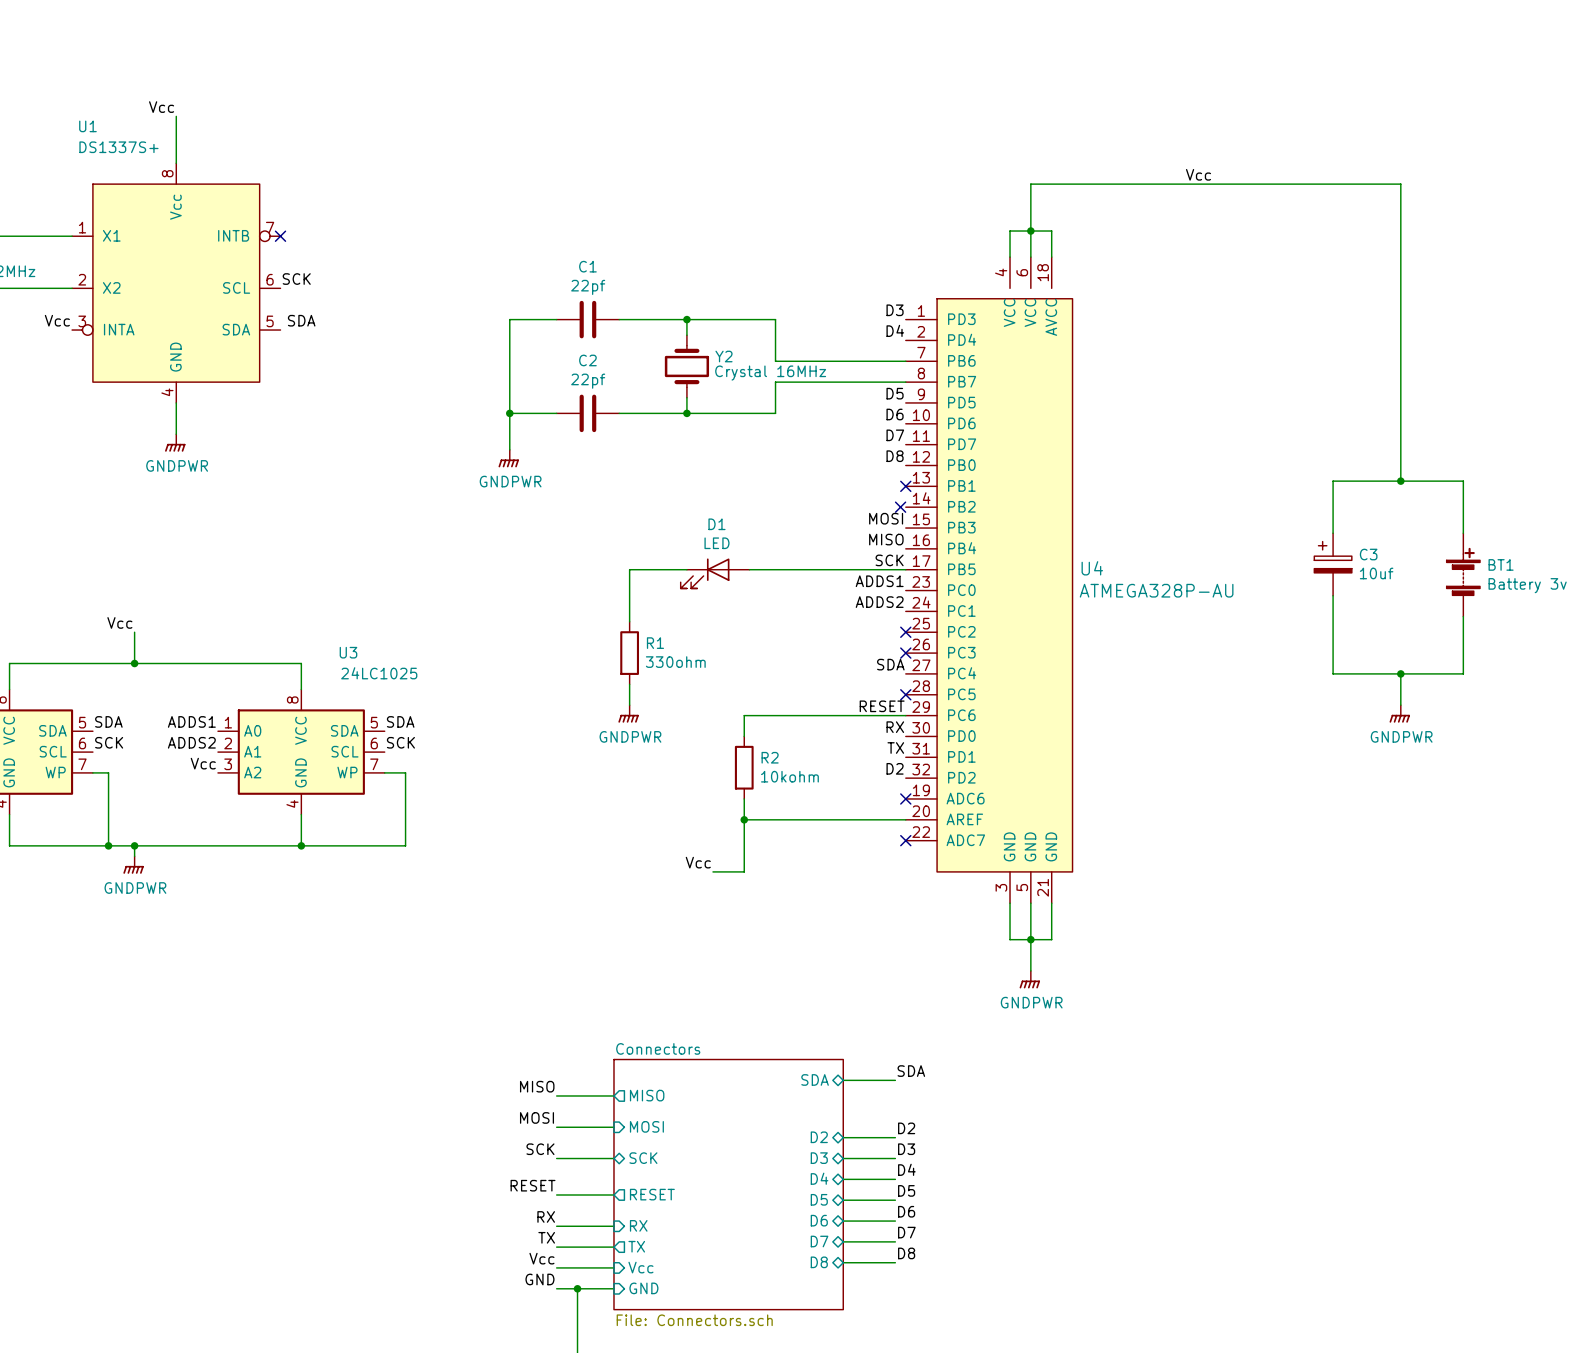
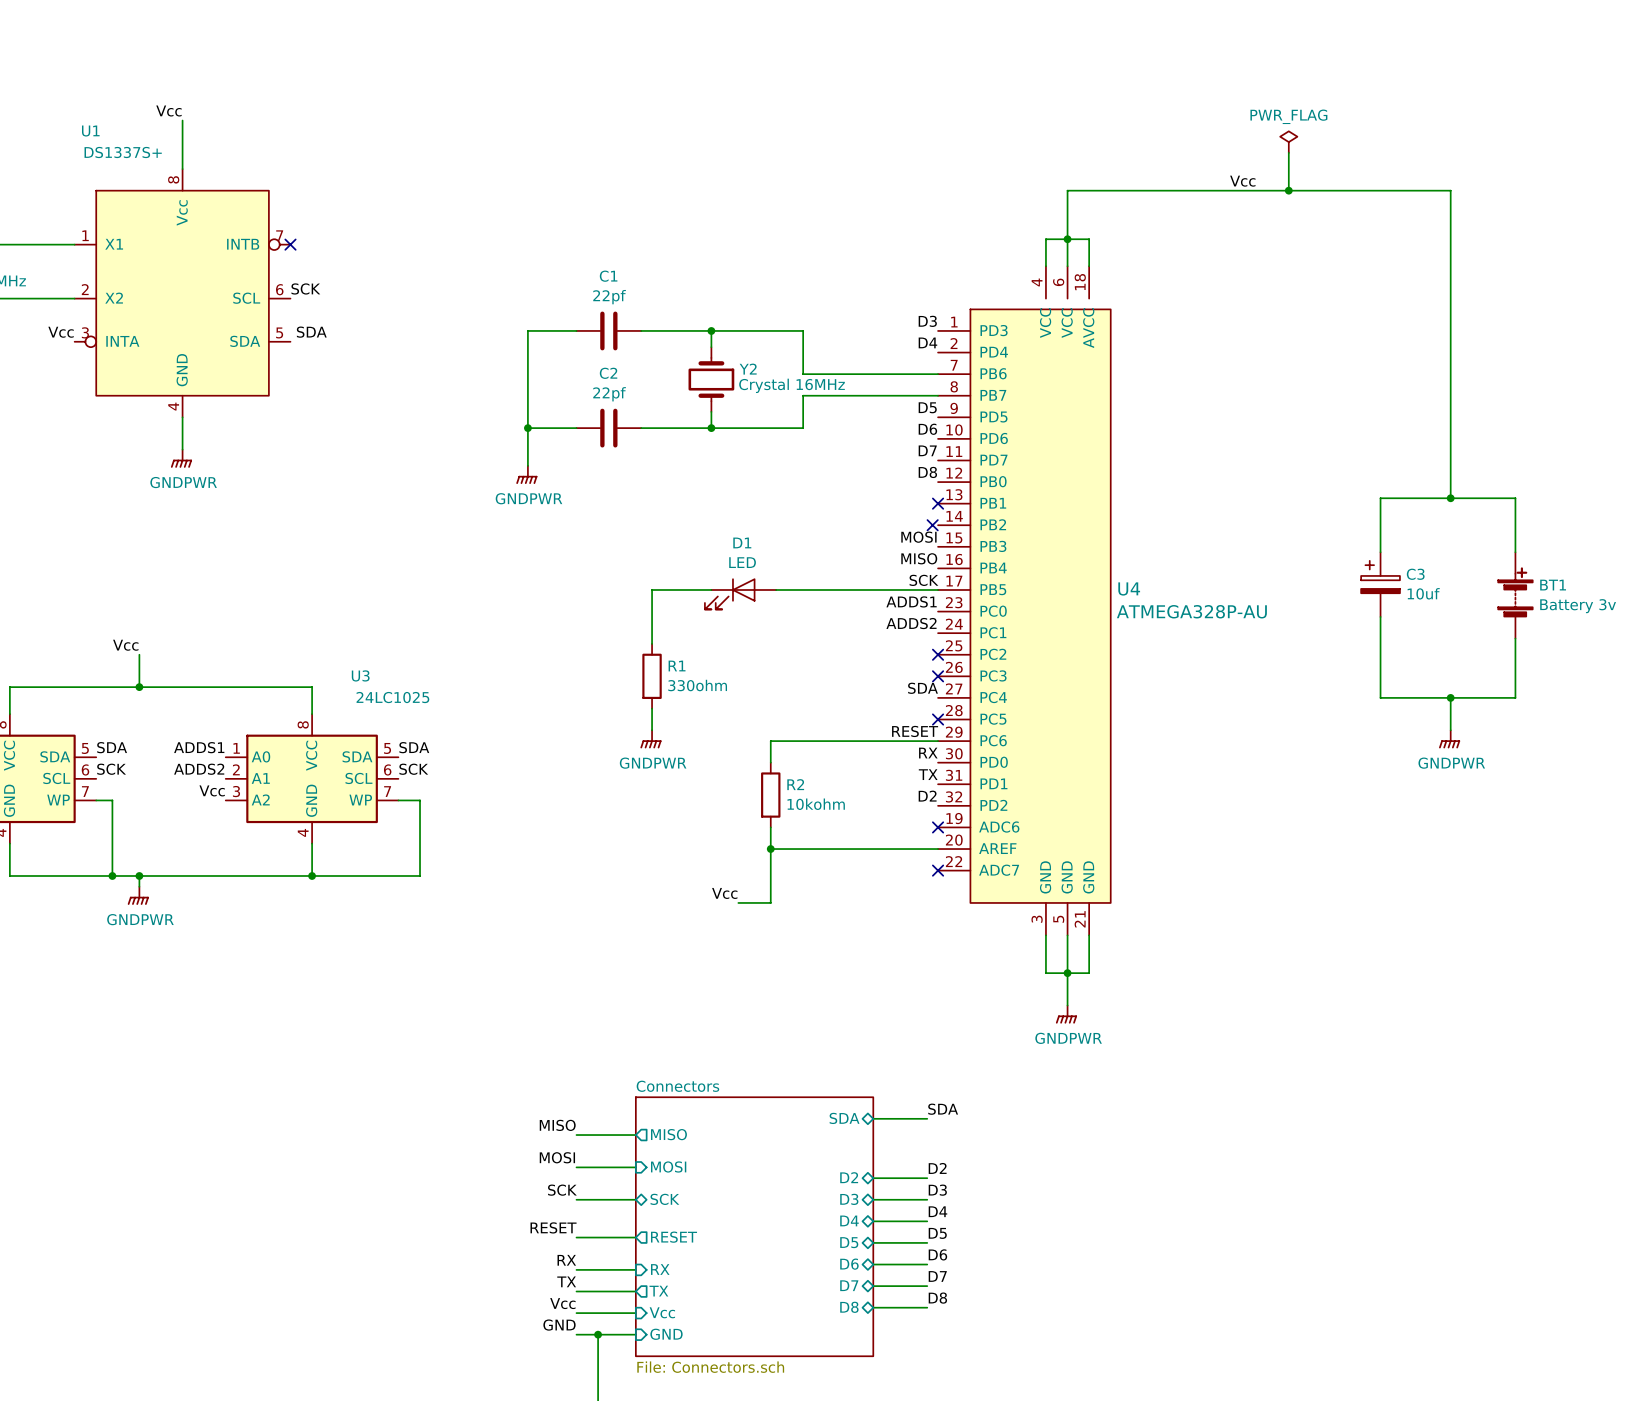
power symbol: none -> PWR_FLAG (1288, 142)
wire: none -> (1288, 152) (1288, 190)
junction: none -> (1288, 190)

